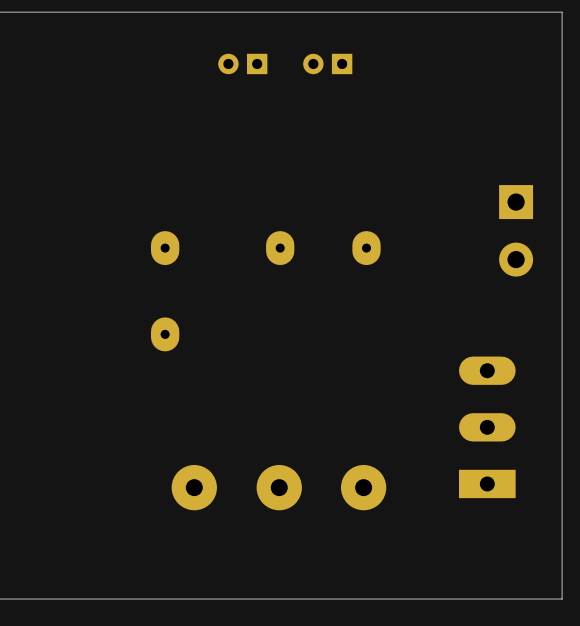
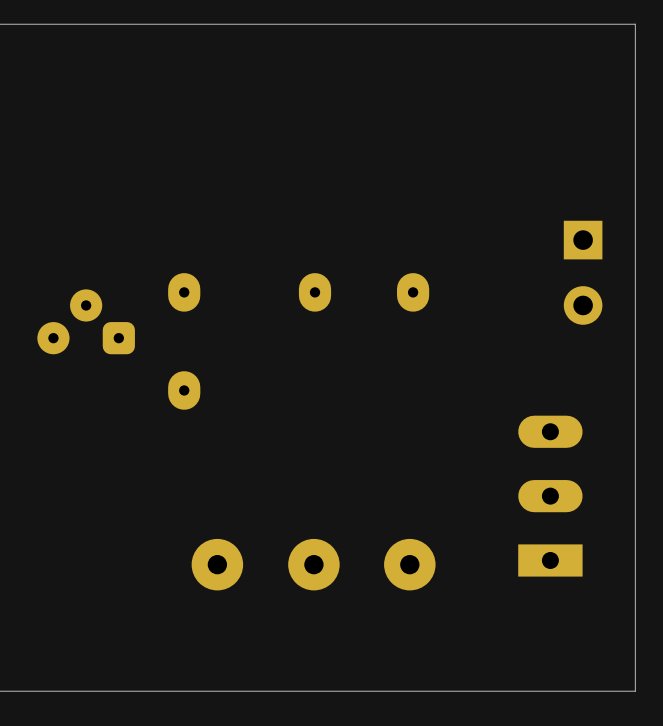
part: (242, 63) -> none
part: (327, 63) -> none
part: none -> (86, 321)

